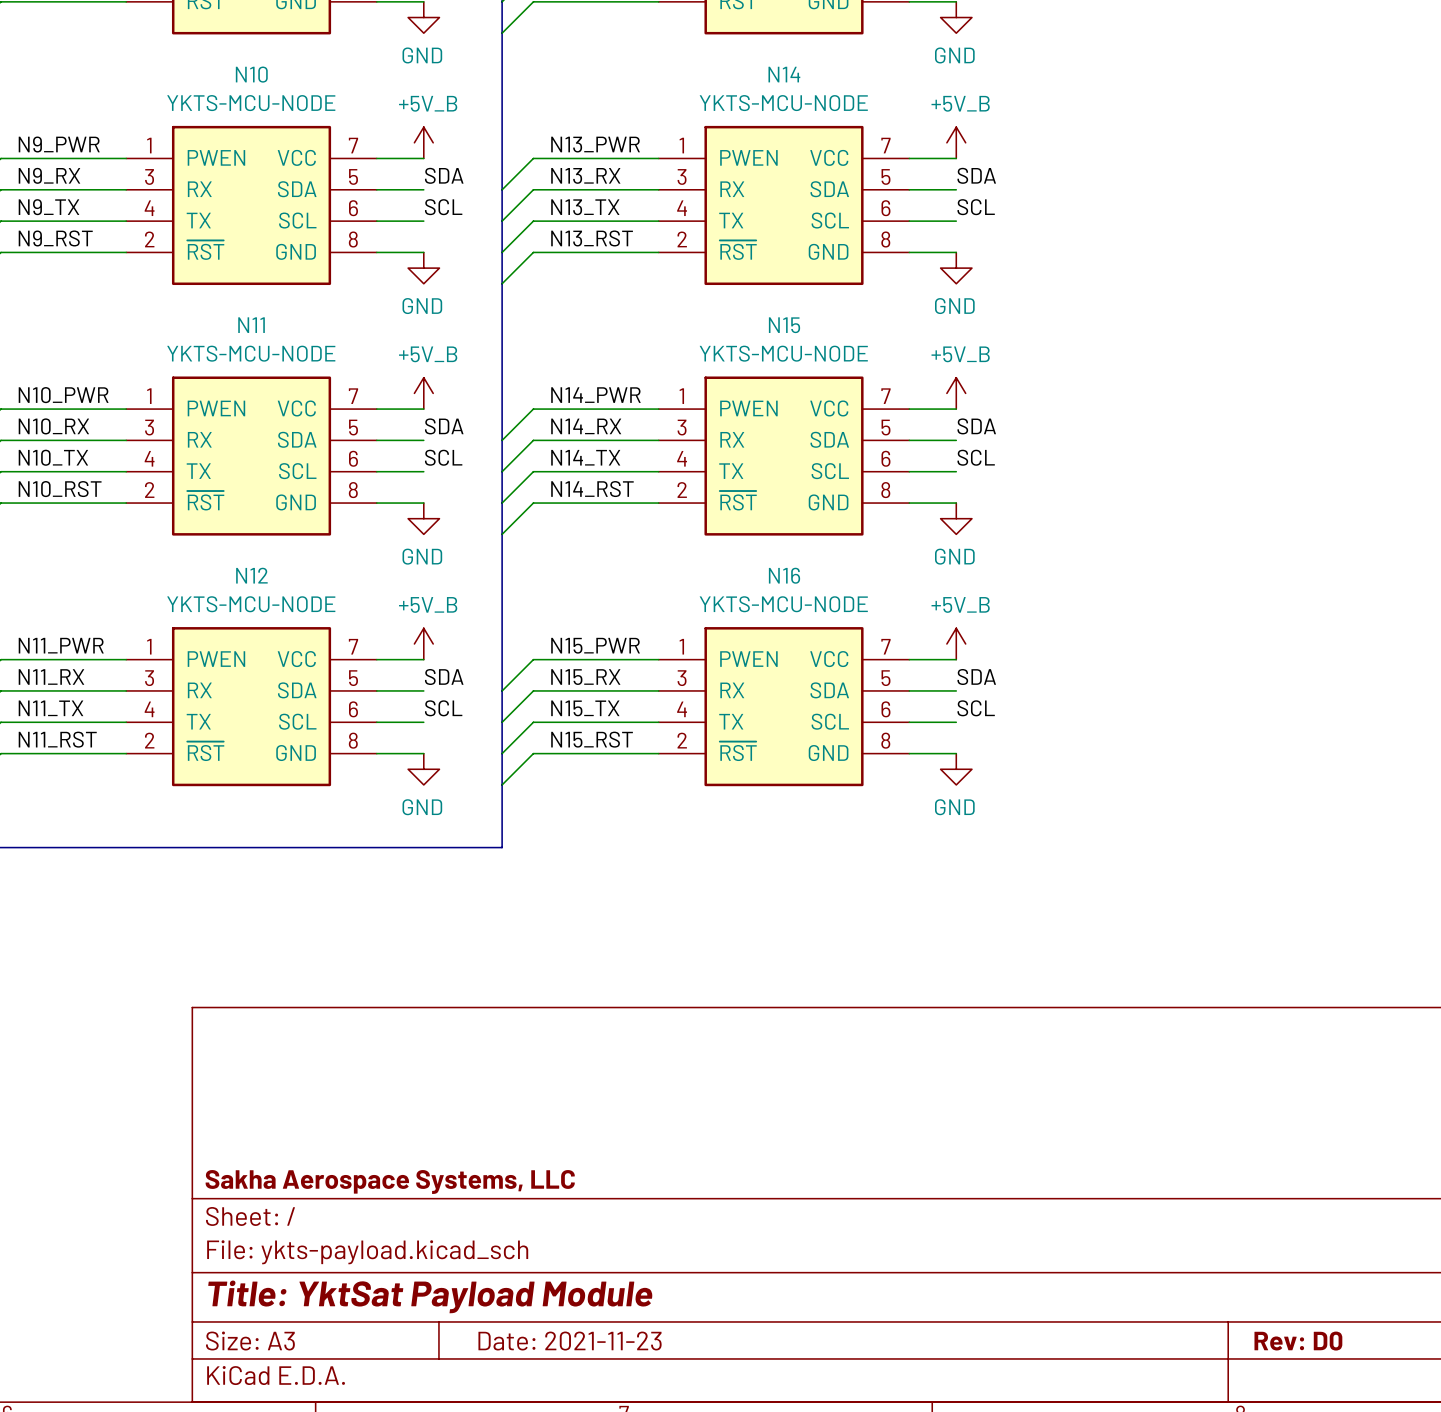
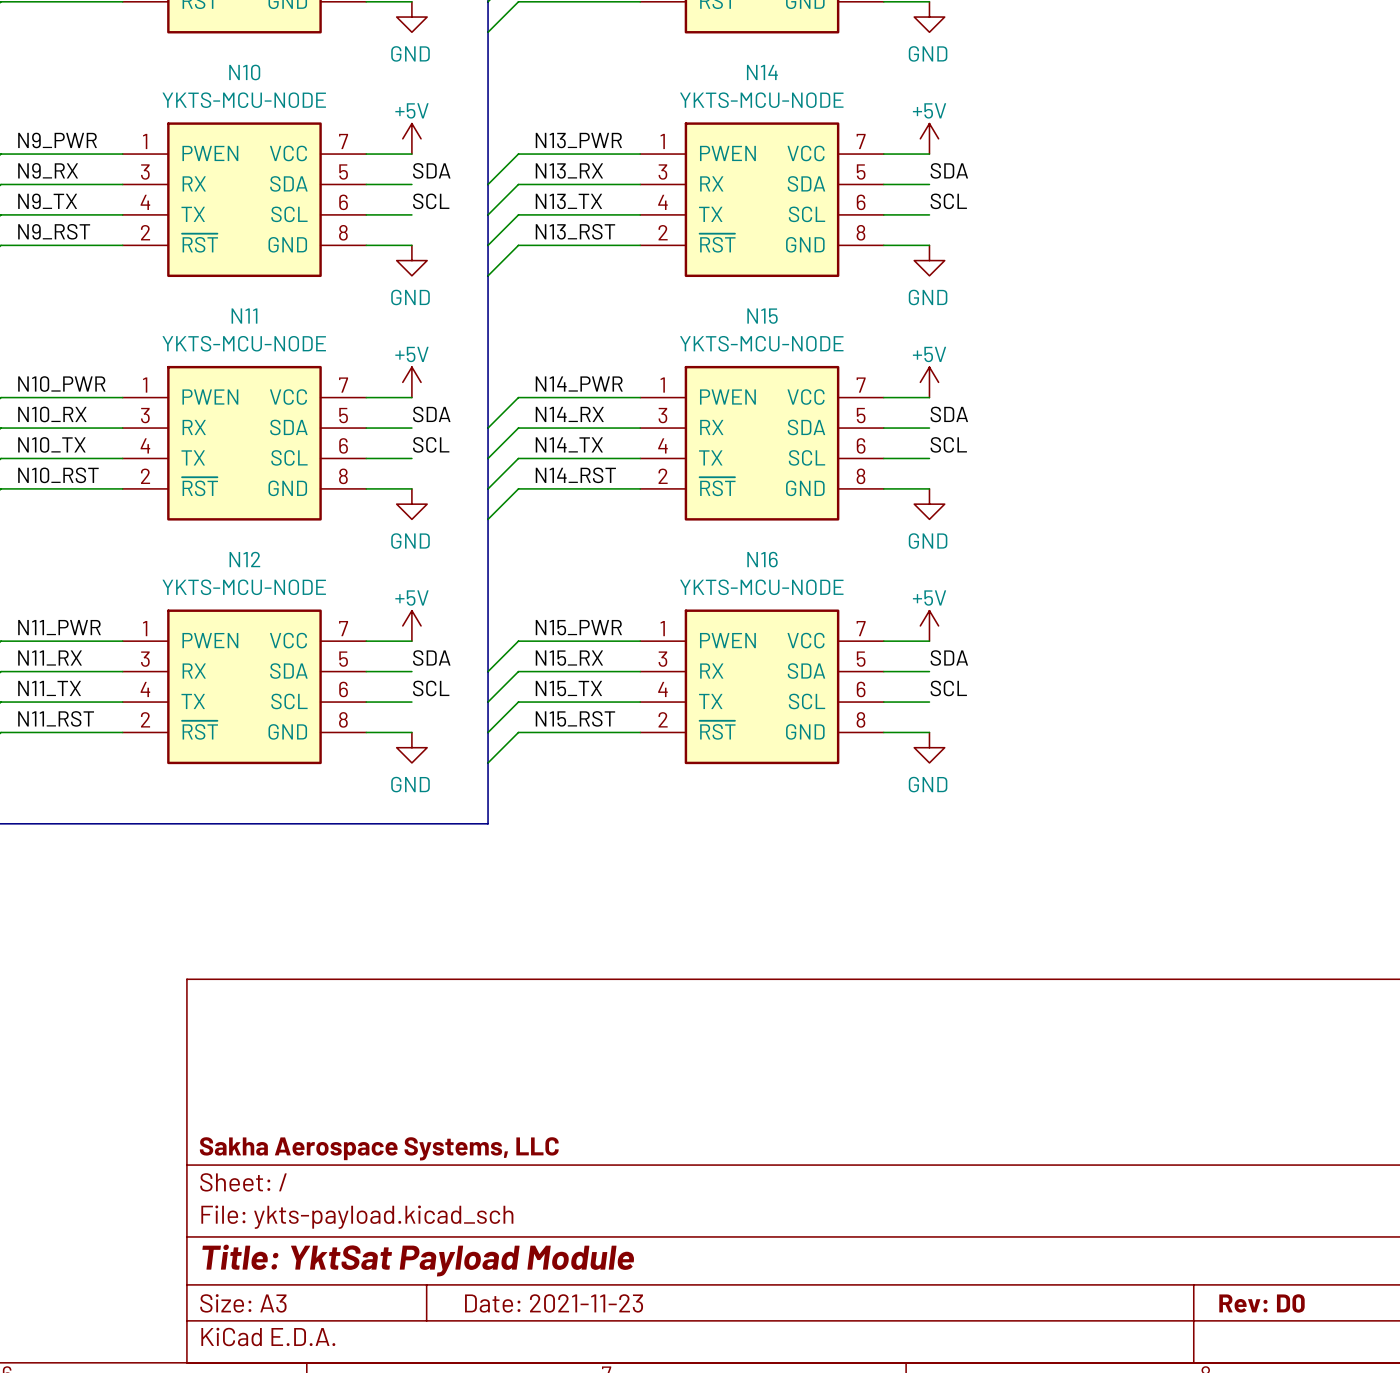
power symbol: +5V_B (423, 142) -> +5V (411, 138)
power symbol: +5V_B (956, 142) -> +5V (929, 138)
power symbol: +5V_B (423, 393) -> +5V (411, 382)
power symbol: +5V_B (956, 393) -> +5V (929, 382)
power symbol: +5V_B (423, 643) -> +5V (411, 625)
power symbol: +5V_B (956, 643) -> +5V (929, 625)

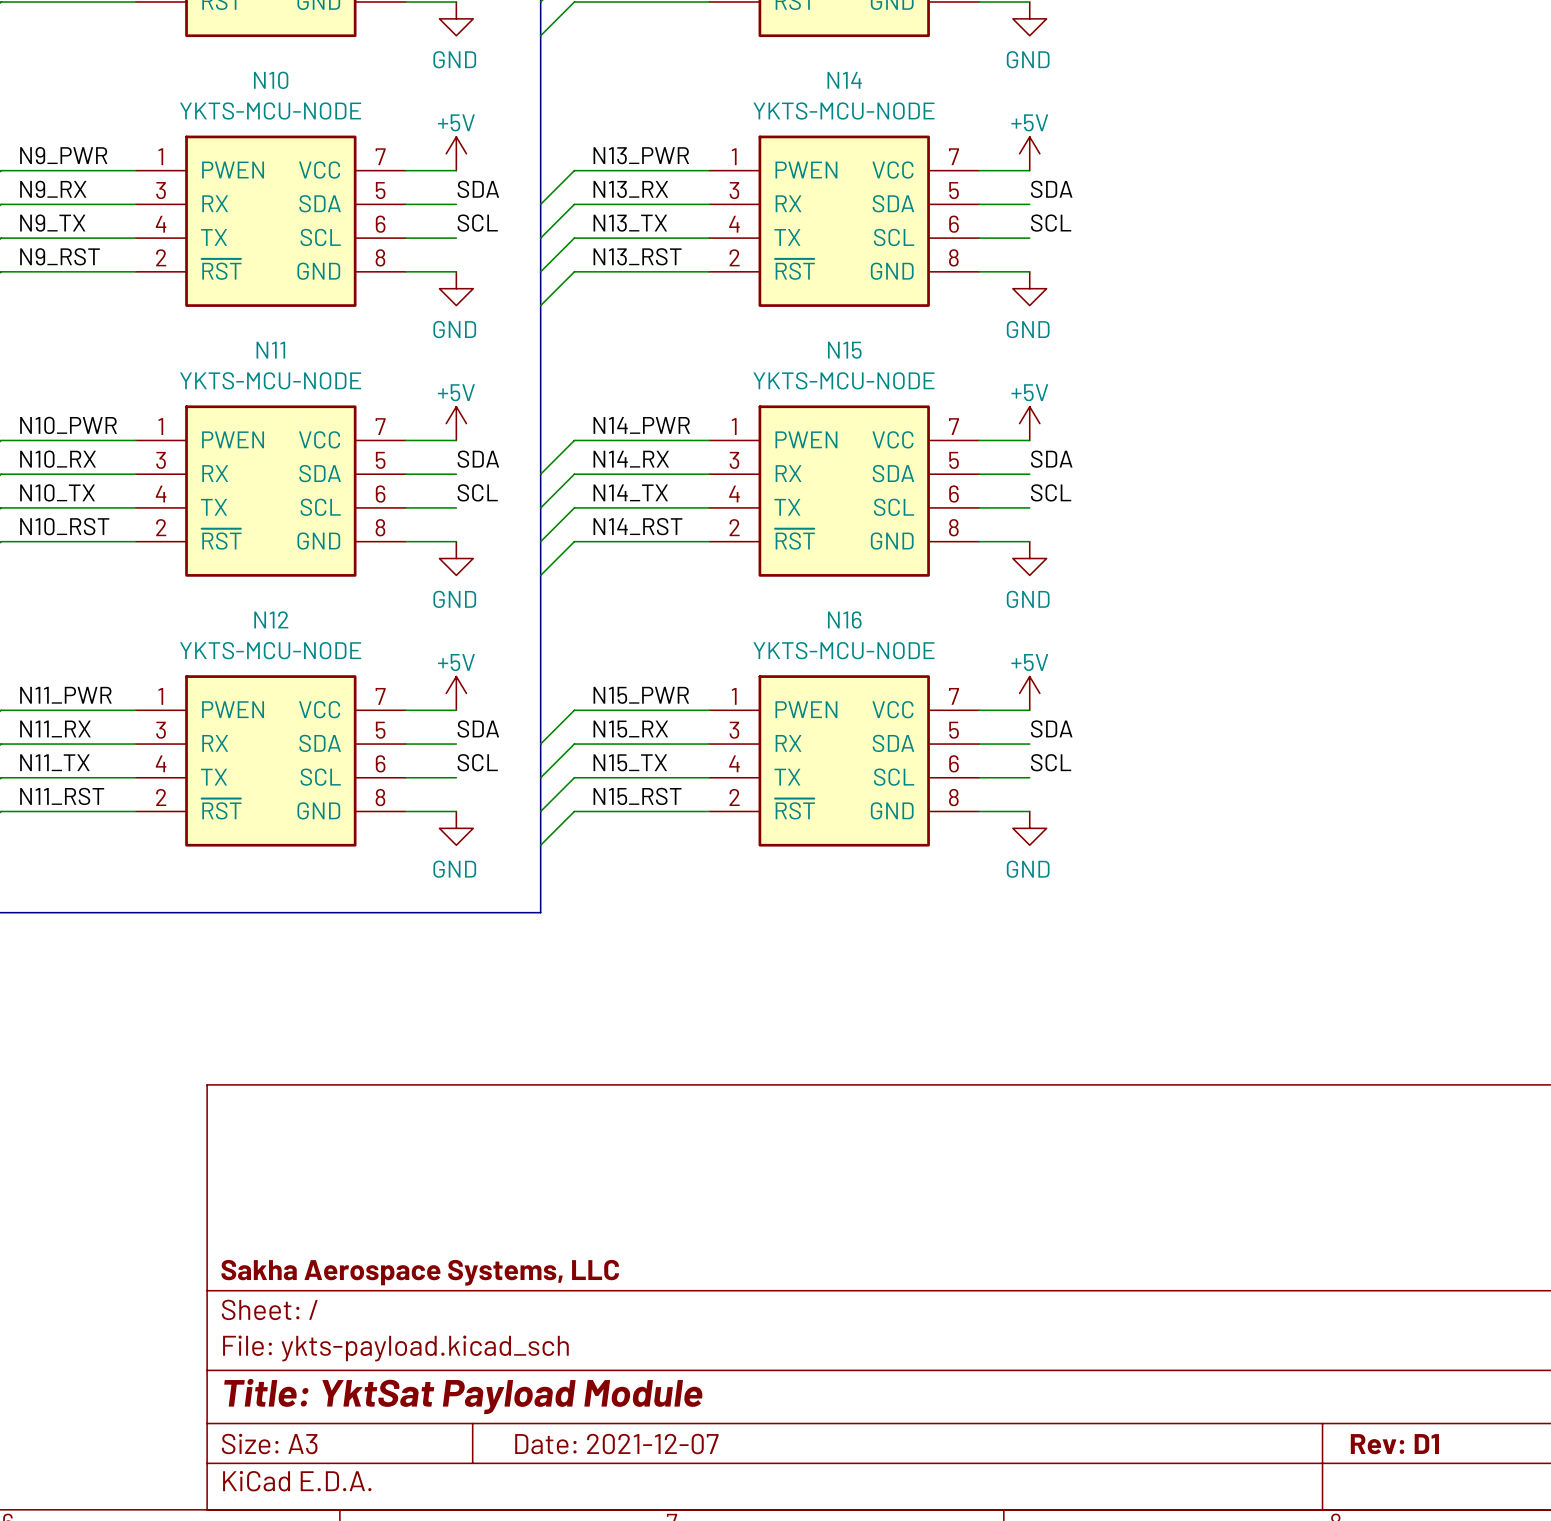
title block: Date: 2021-11-23 (554, 1303) -> Date: 2021-12-07 (616, 1444)
title block: Rev: D0 (1261, 1303) -> Rev: D1 (1394, 1444)

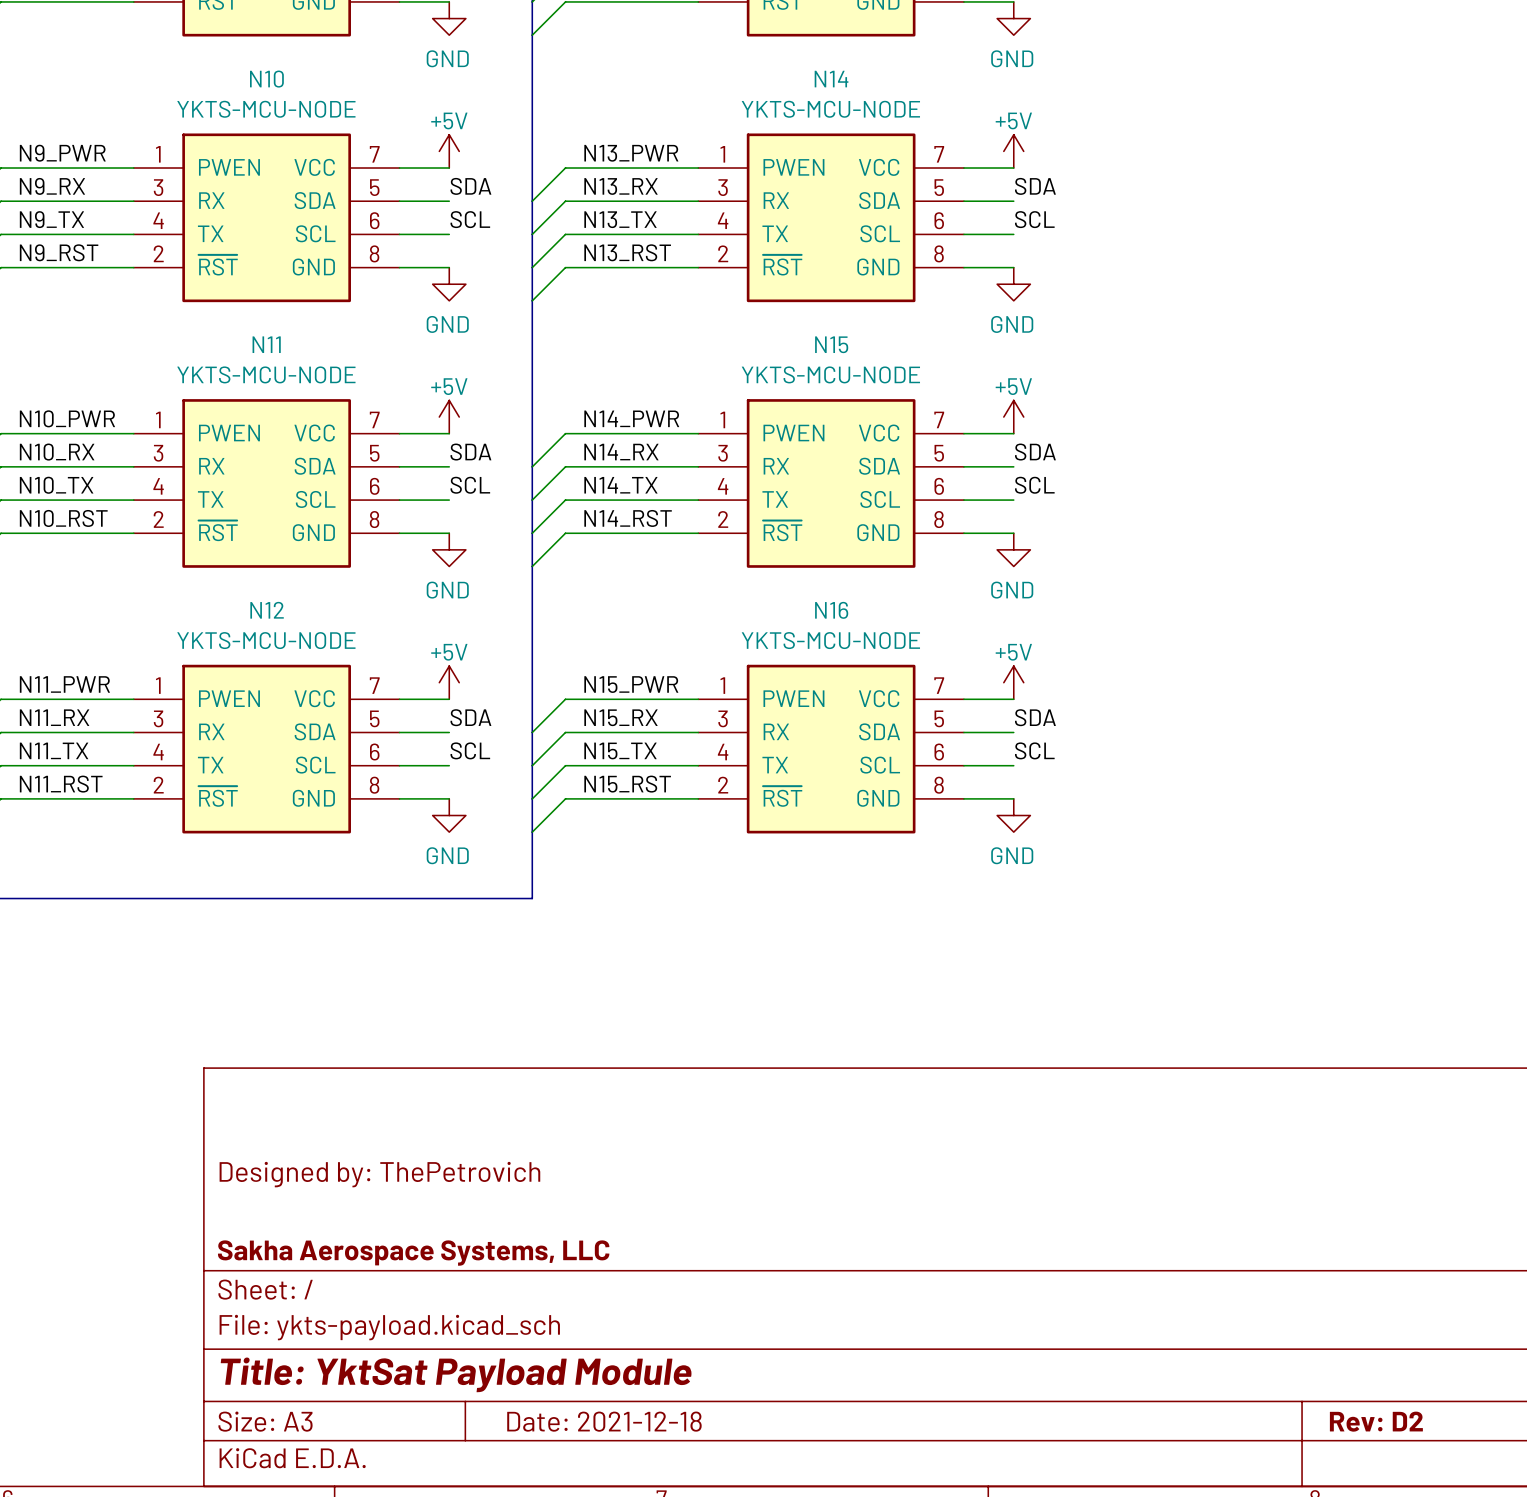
title block: none -> Designed by: ThePetrovich (379, 1174)
title block: Date: 2021-12-07 (616, 1444) -> Date: 2021-12-18 (604, 1421)
title block: Rev: D1 (1394, 1444) -> Rev: D2 (1376, 1421)

